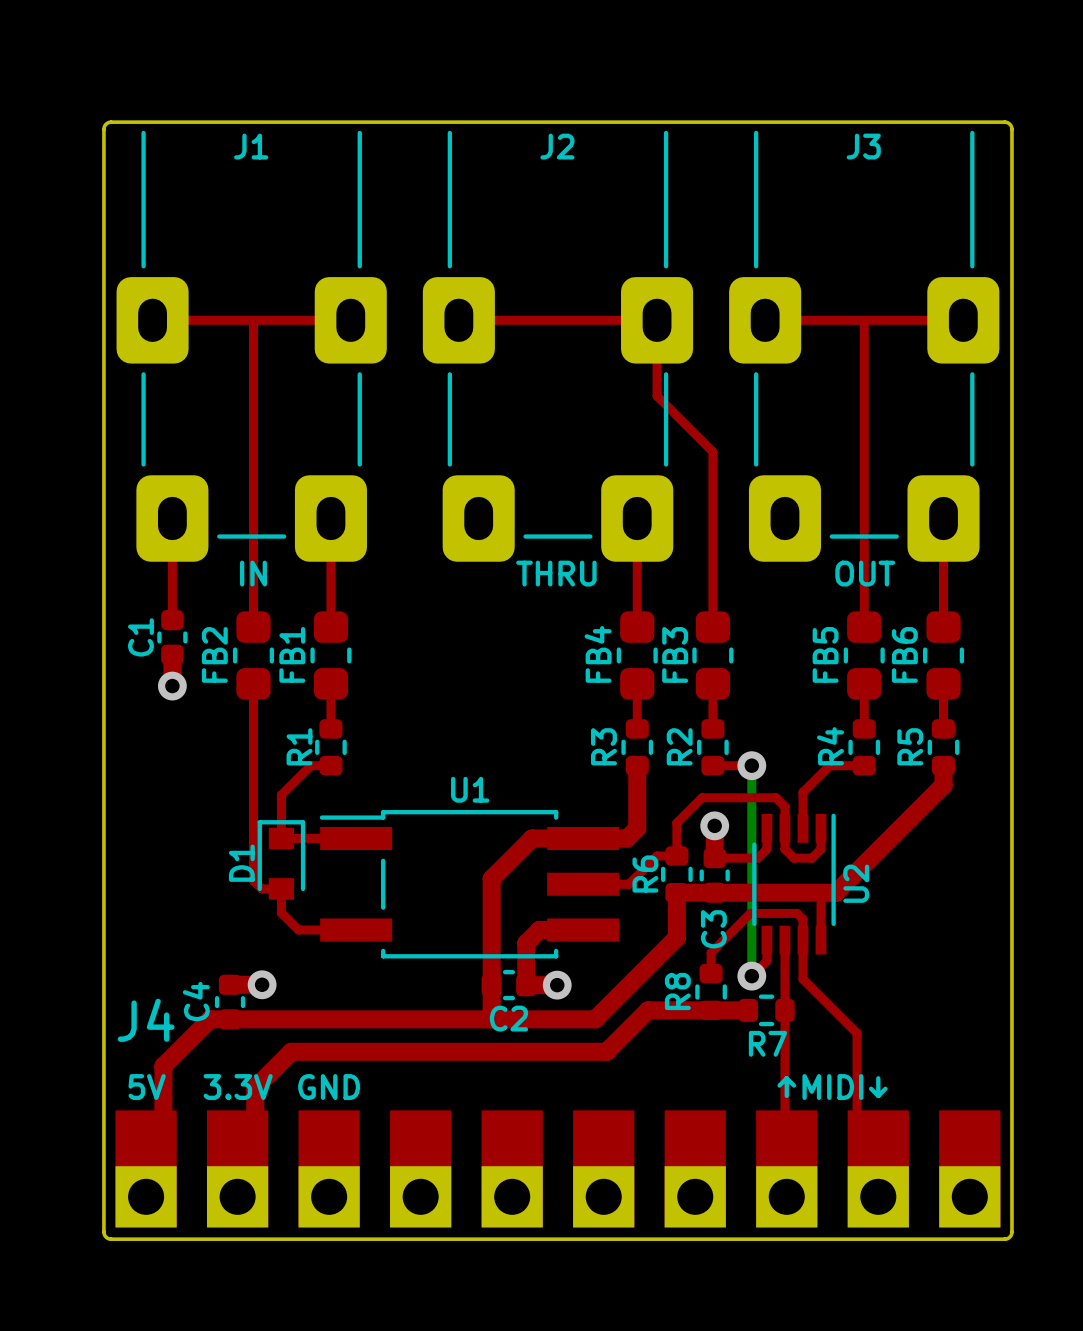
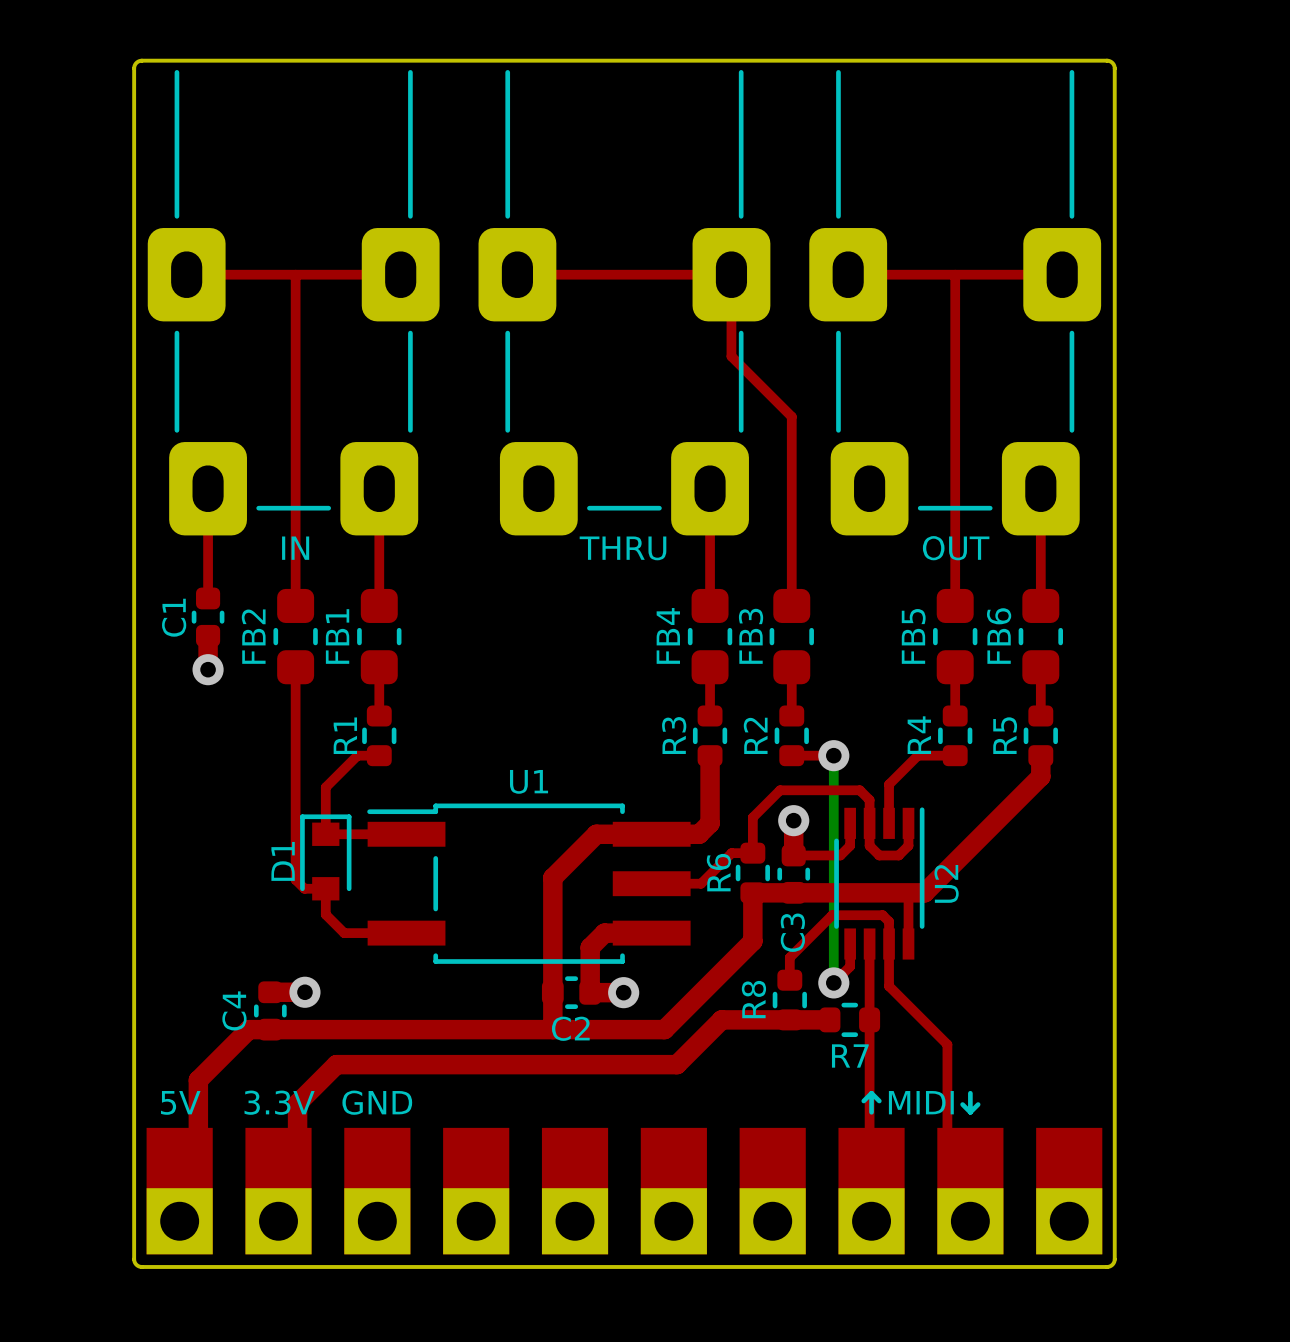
J1 name: J1 (251, 146) -> none
J2 name: J2 (557, 146) -> none
J3 name: J3 (863, 146) -> none
J4 name: J4 (146, 1020) -> none

